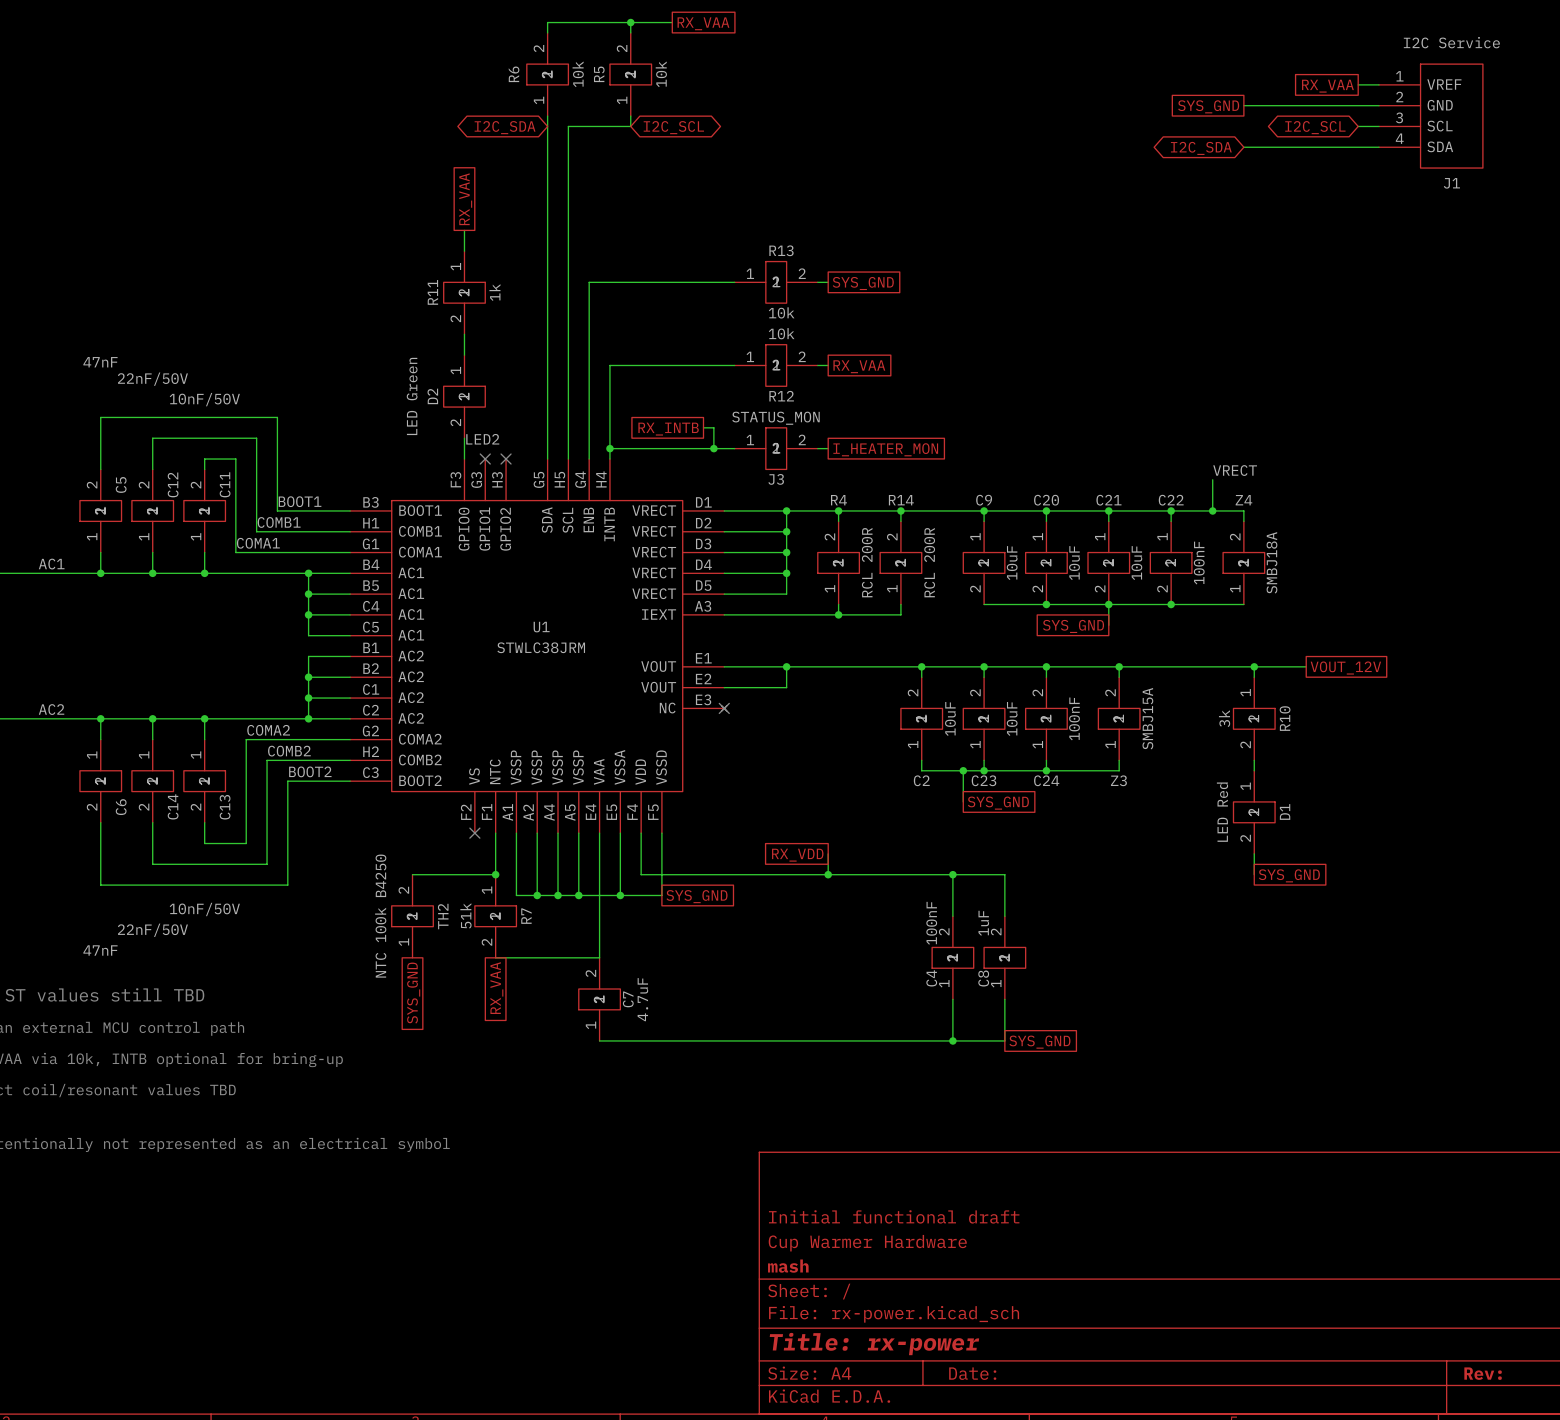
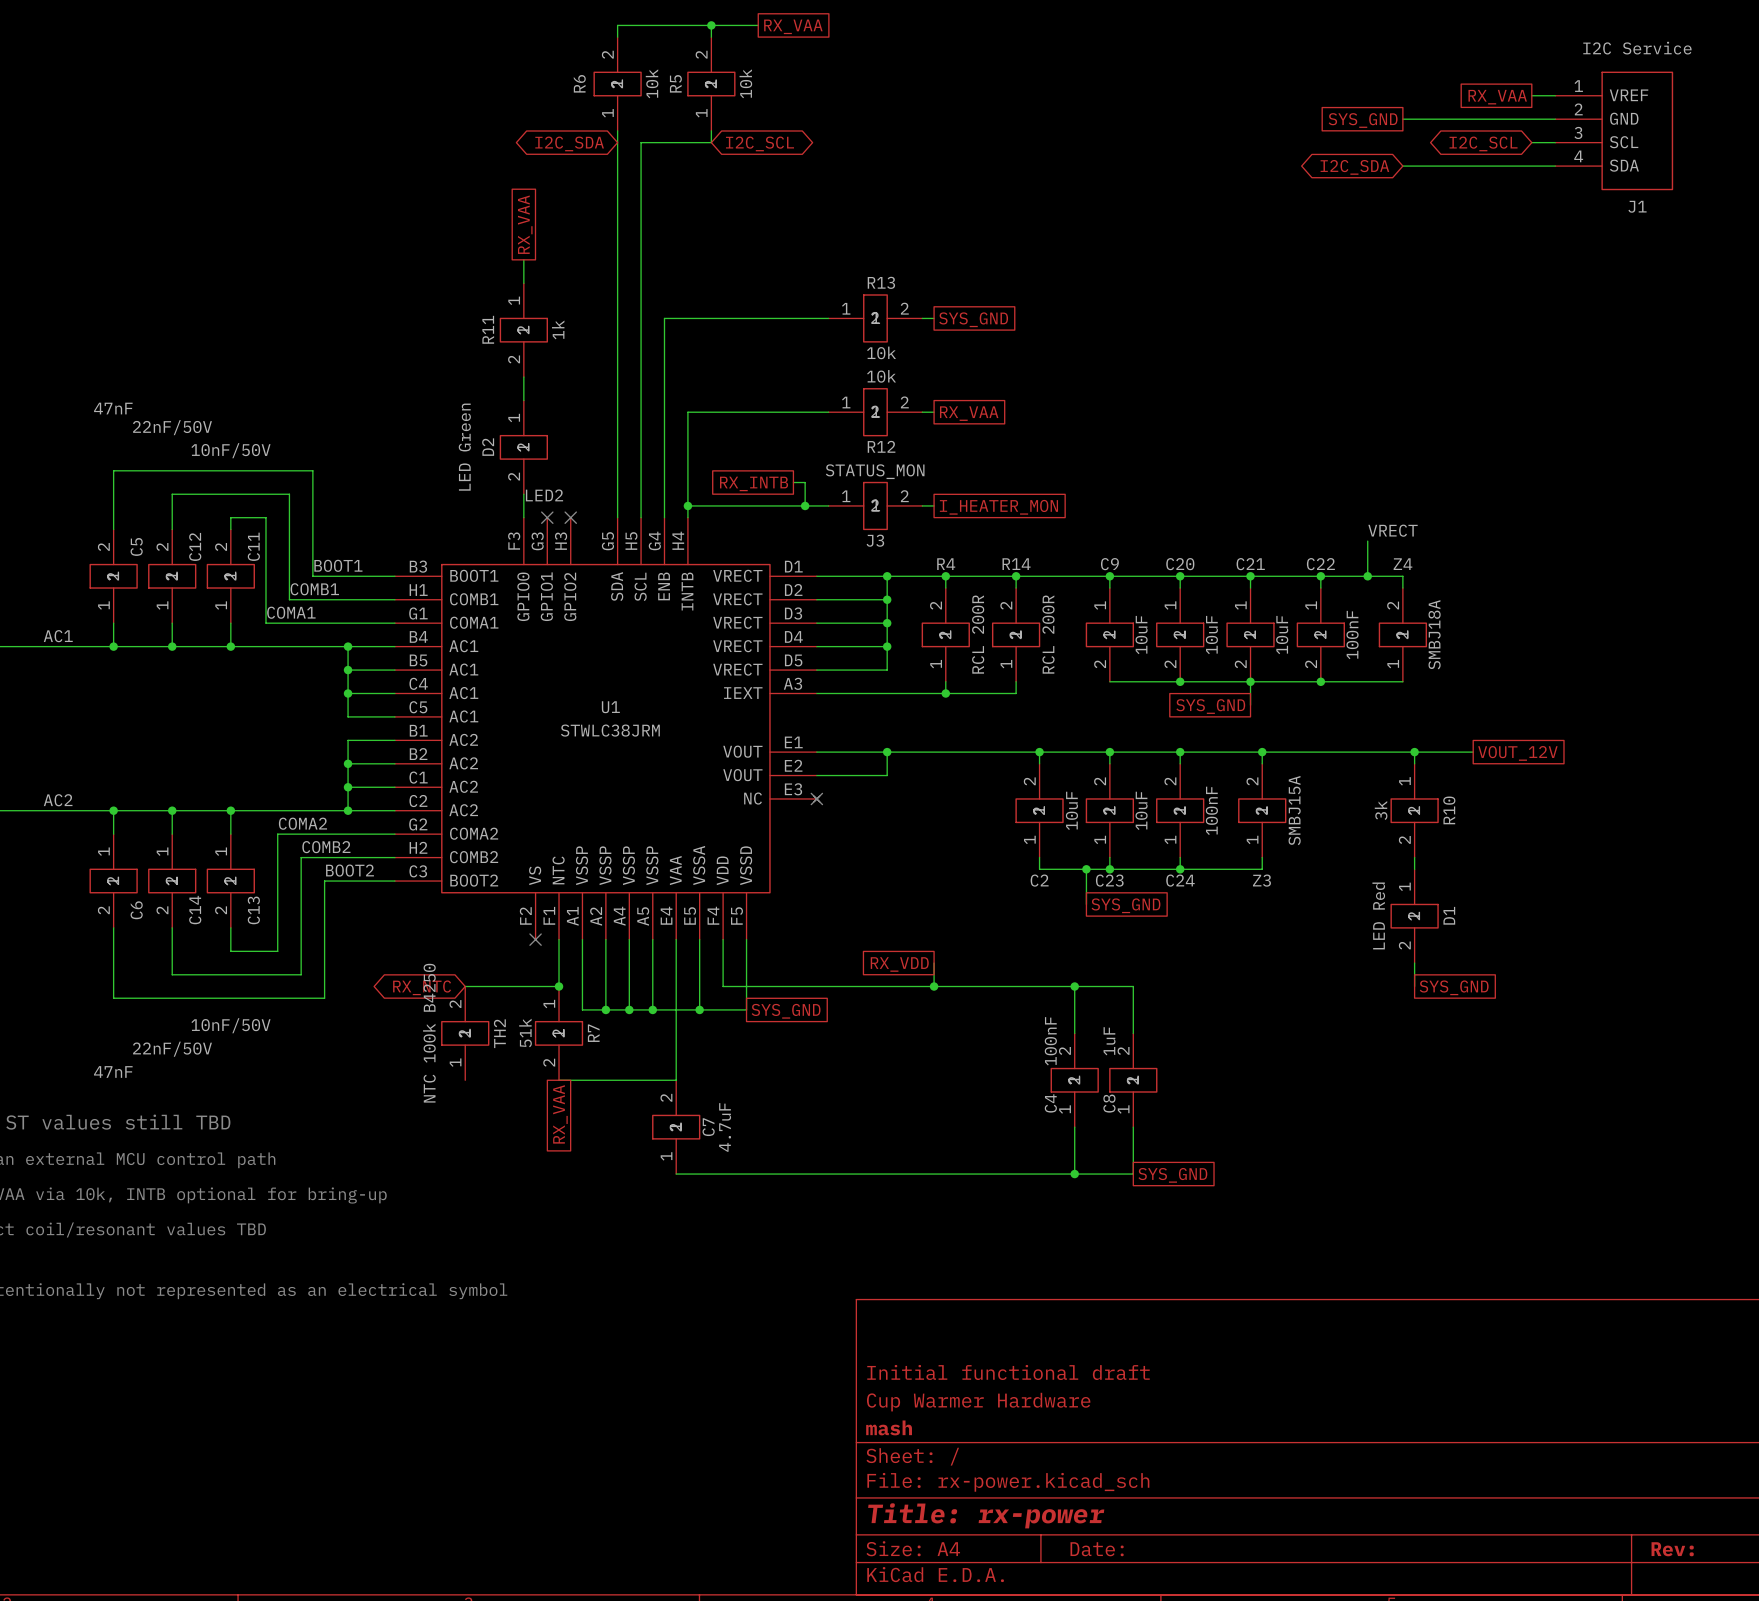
global label: none -> RX_NTC (422, 987)
global label: SYS_GND (413, 993) -> none

